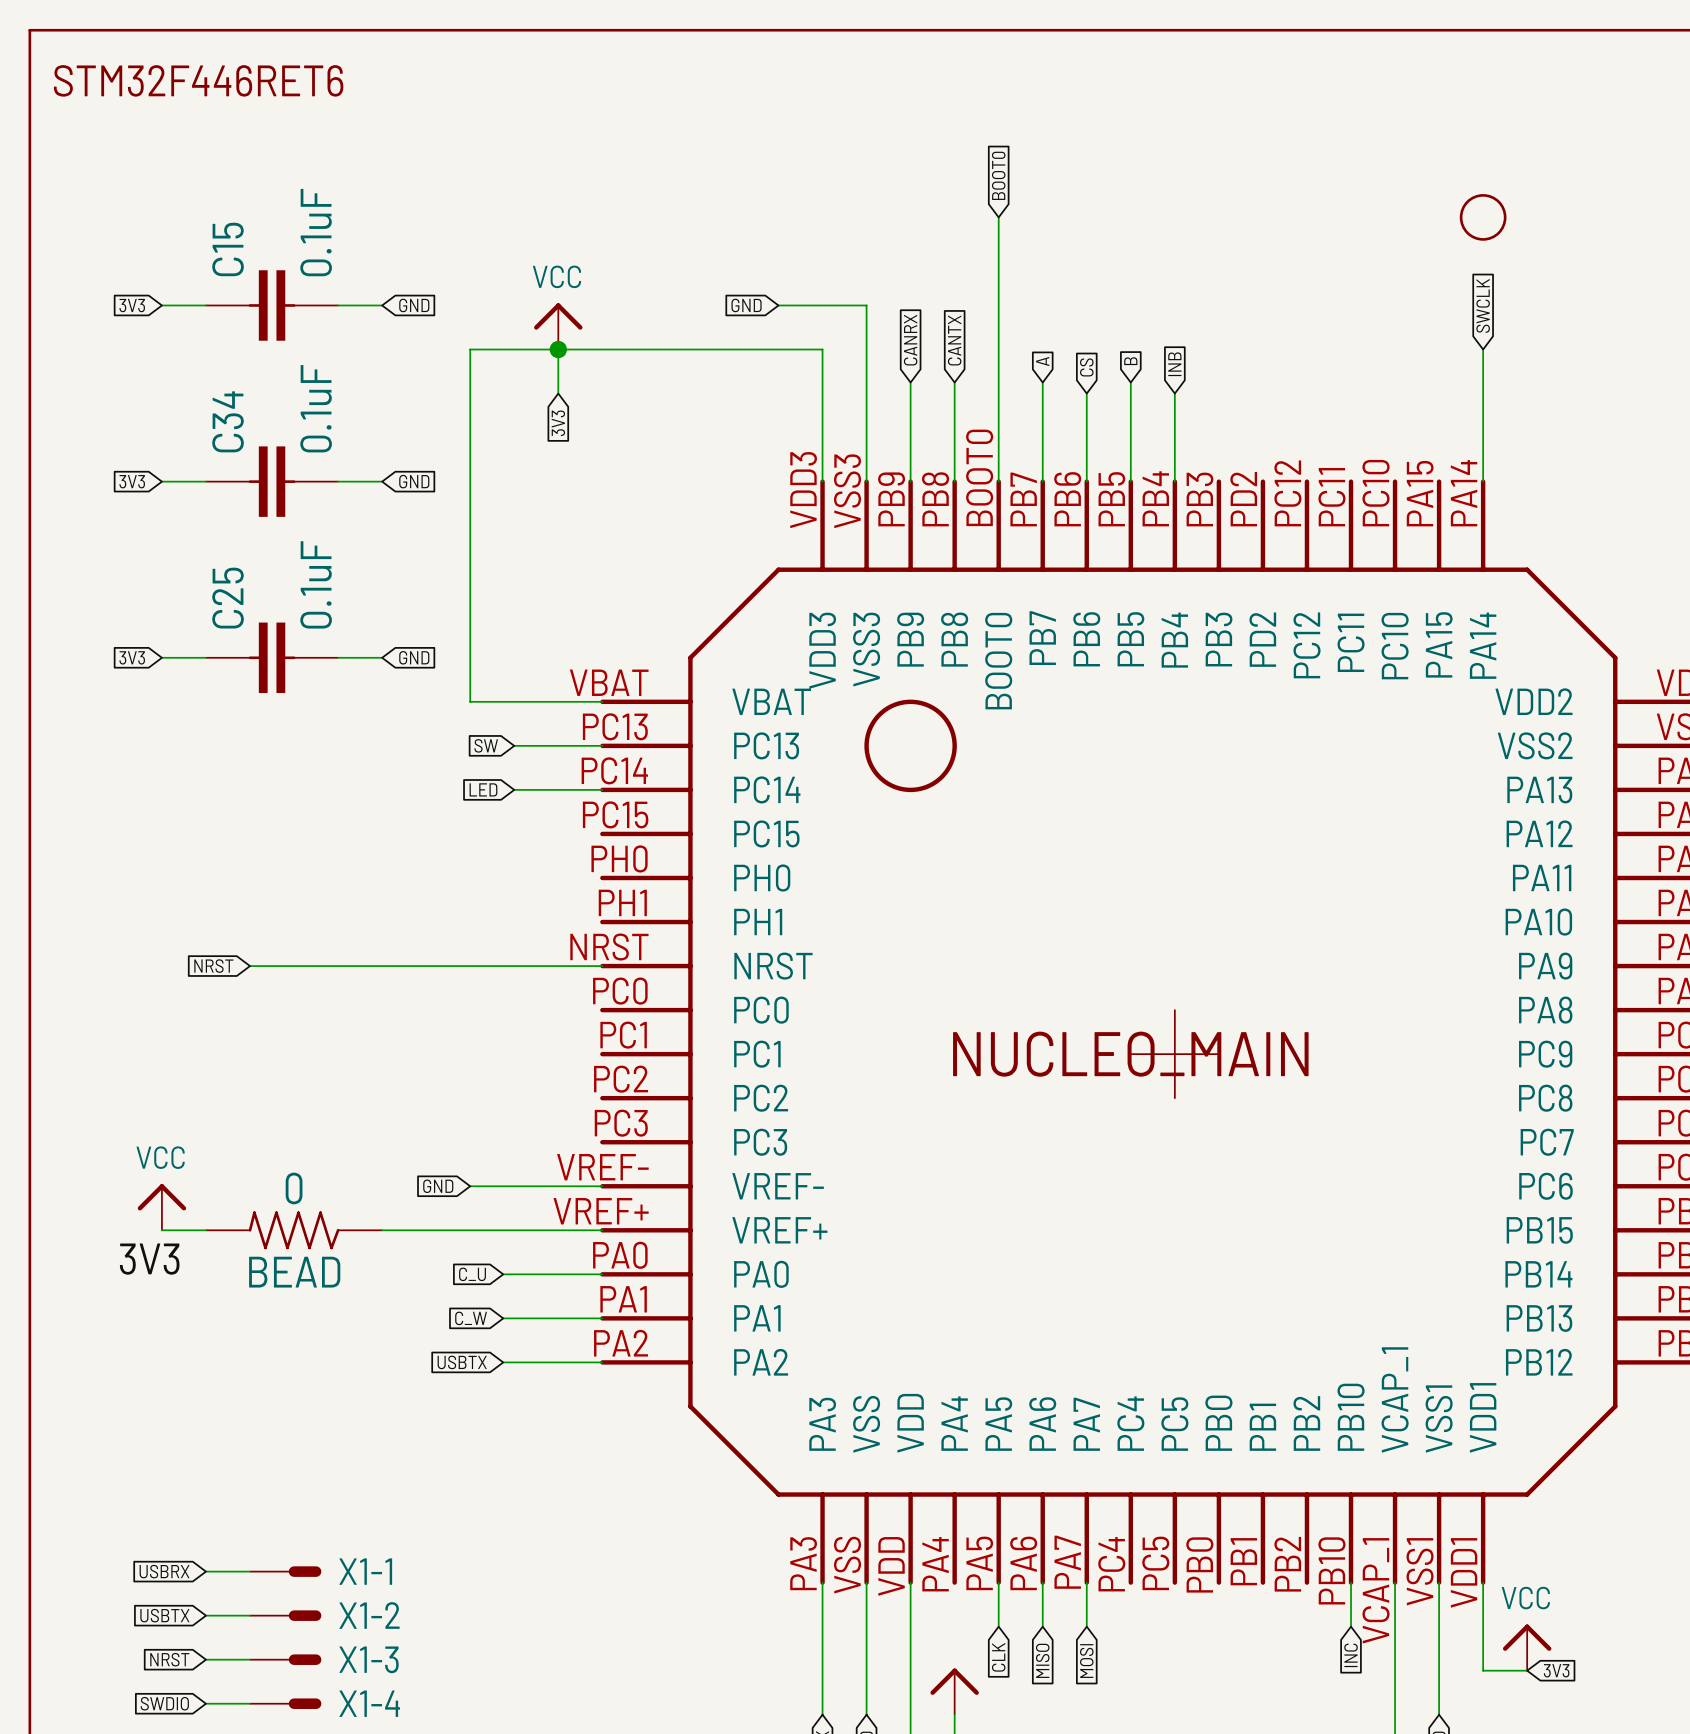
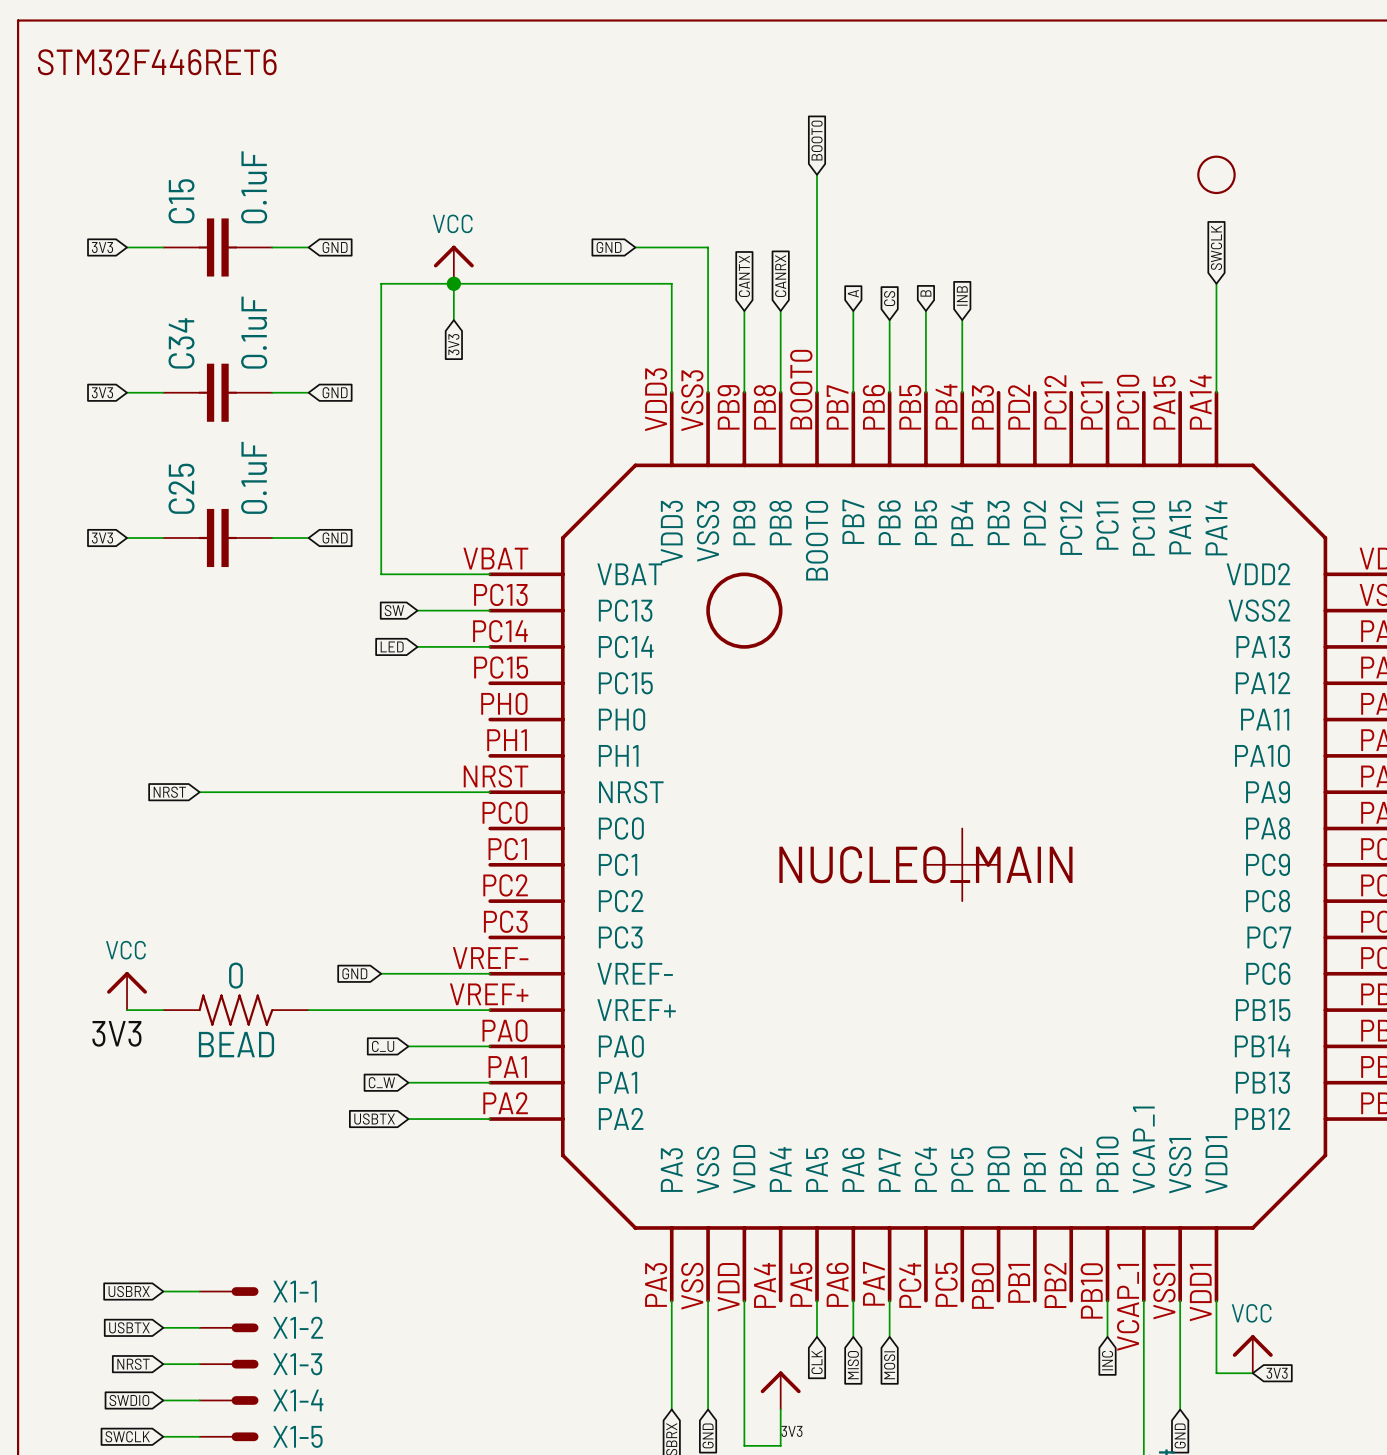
global label: CANRX (910, 340) -> CANTX (744, 276)
global label: CANTX (954, 340) -> CANRX (780, 276)

